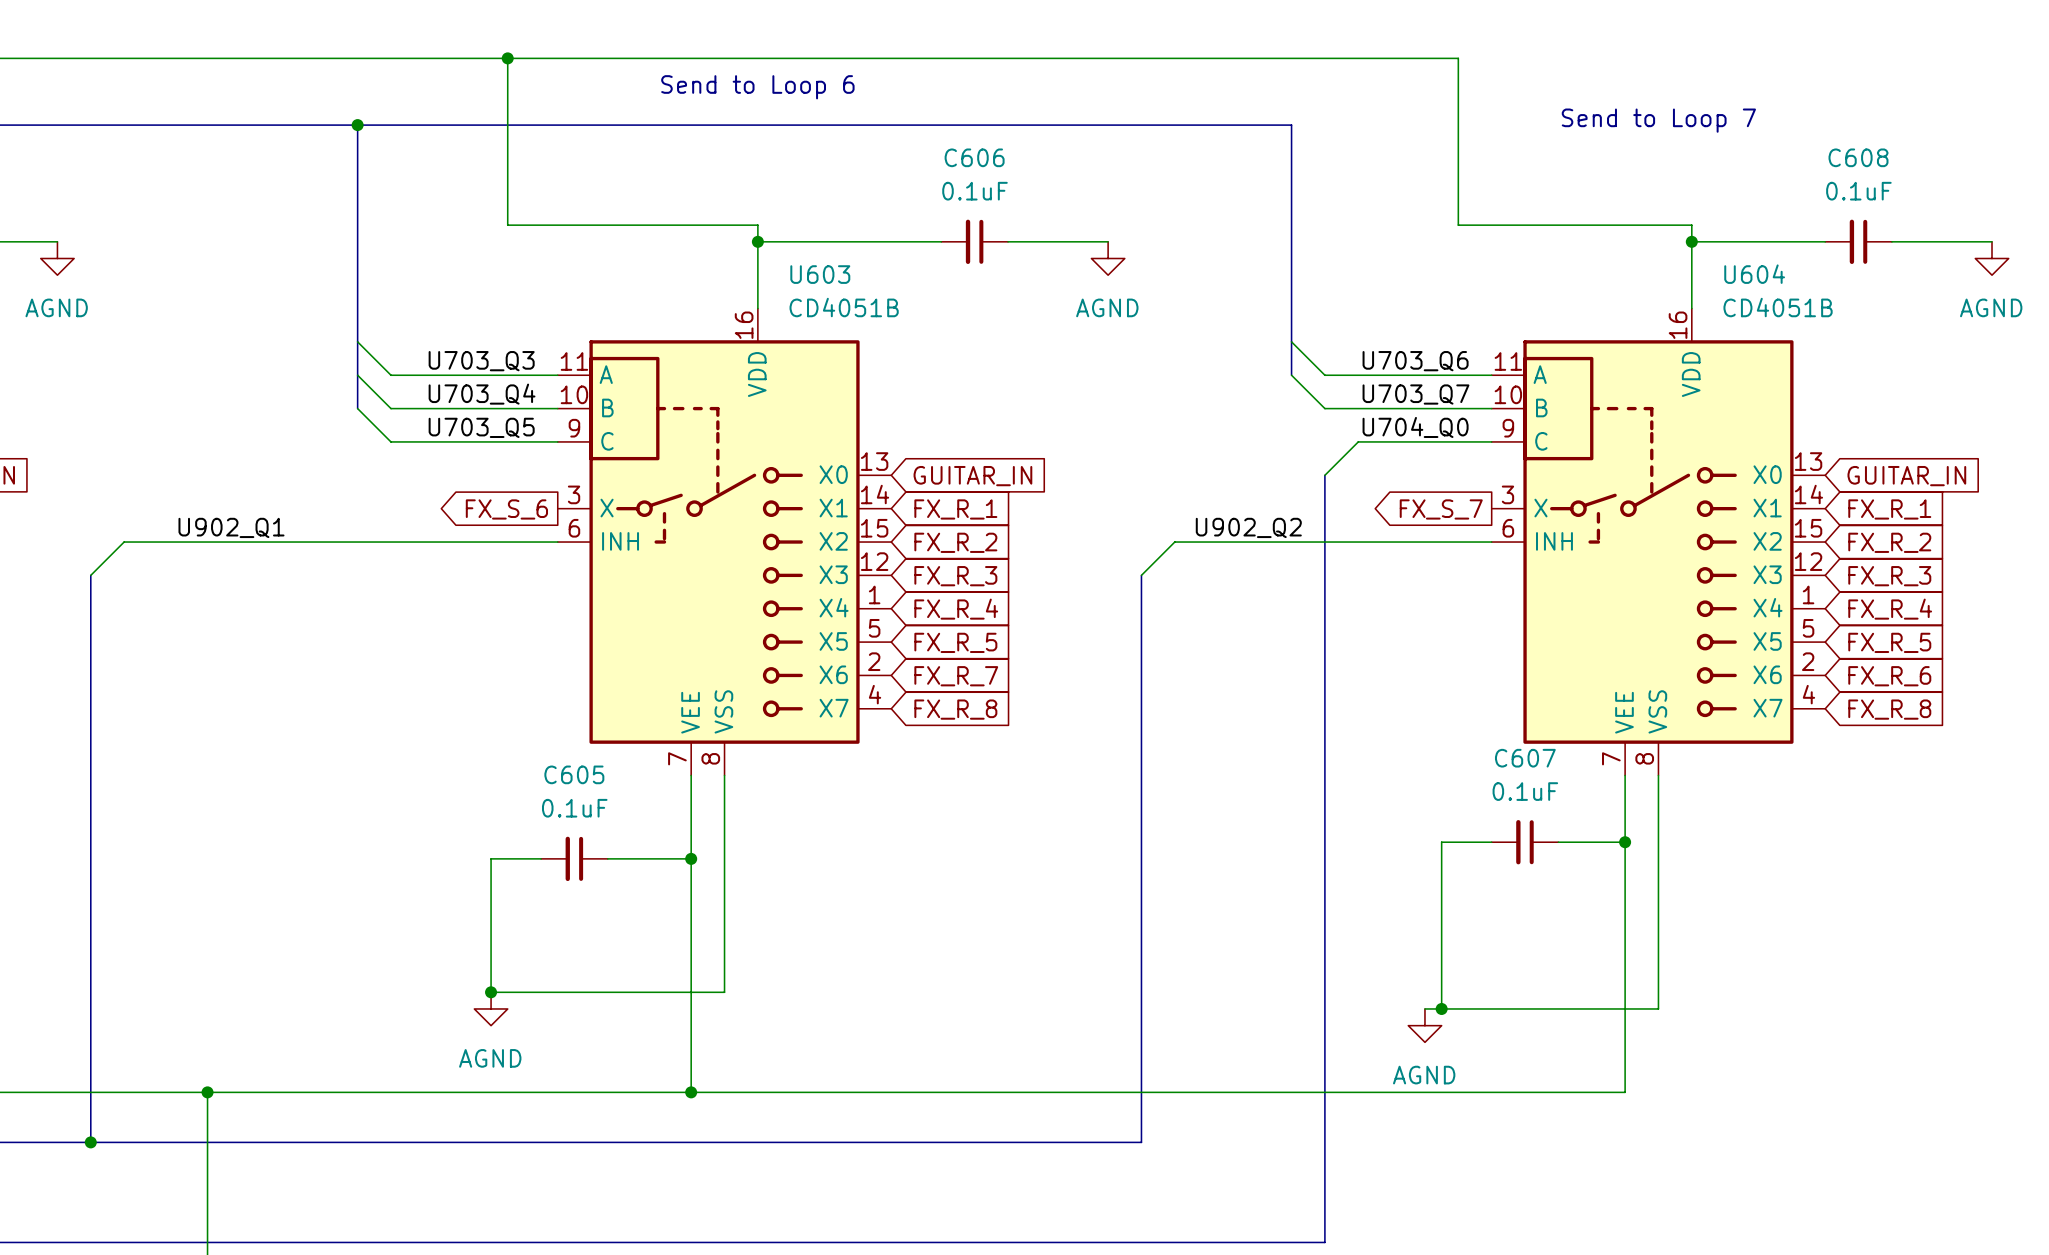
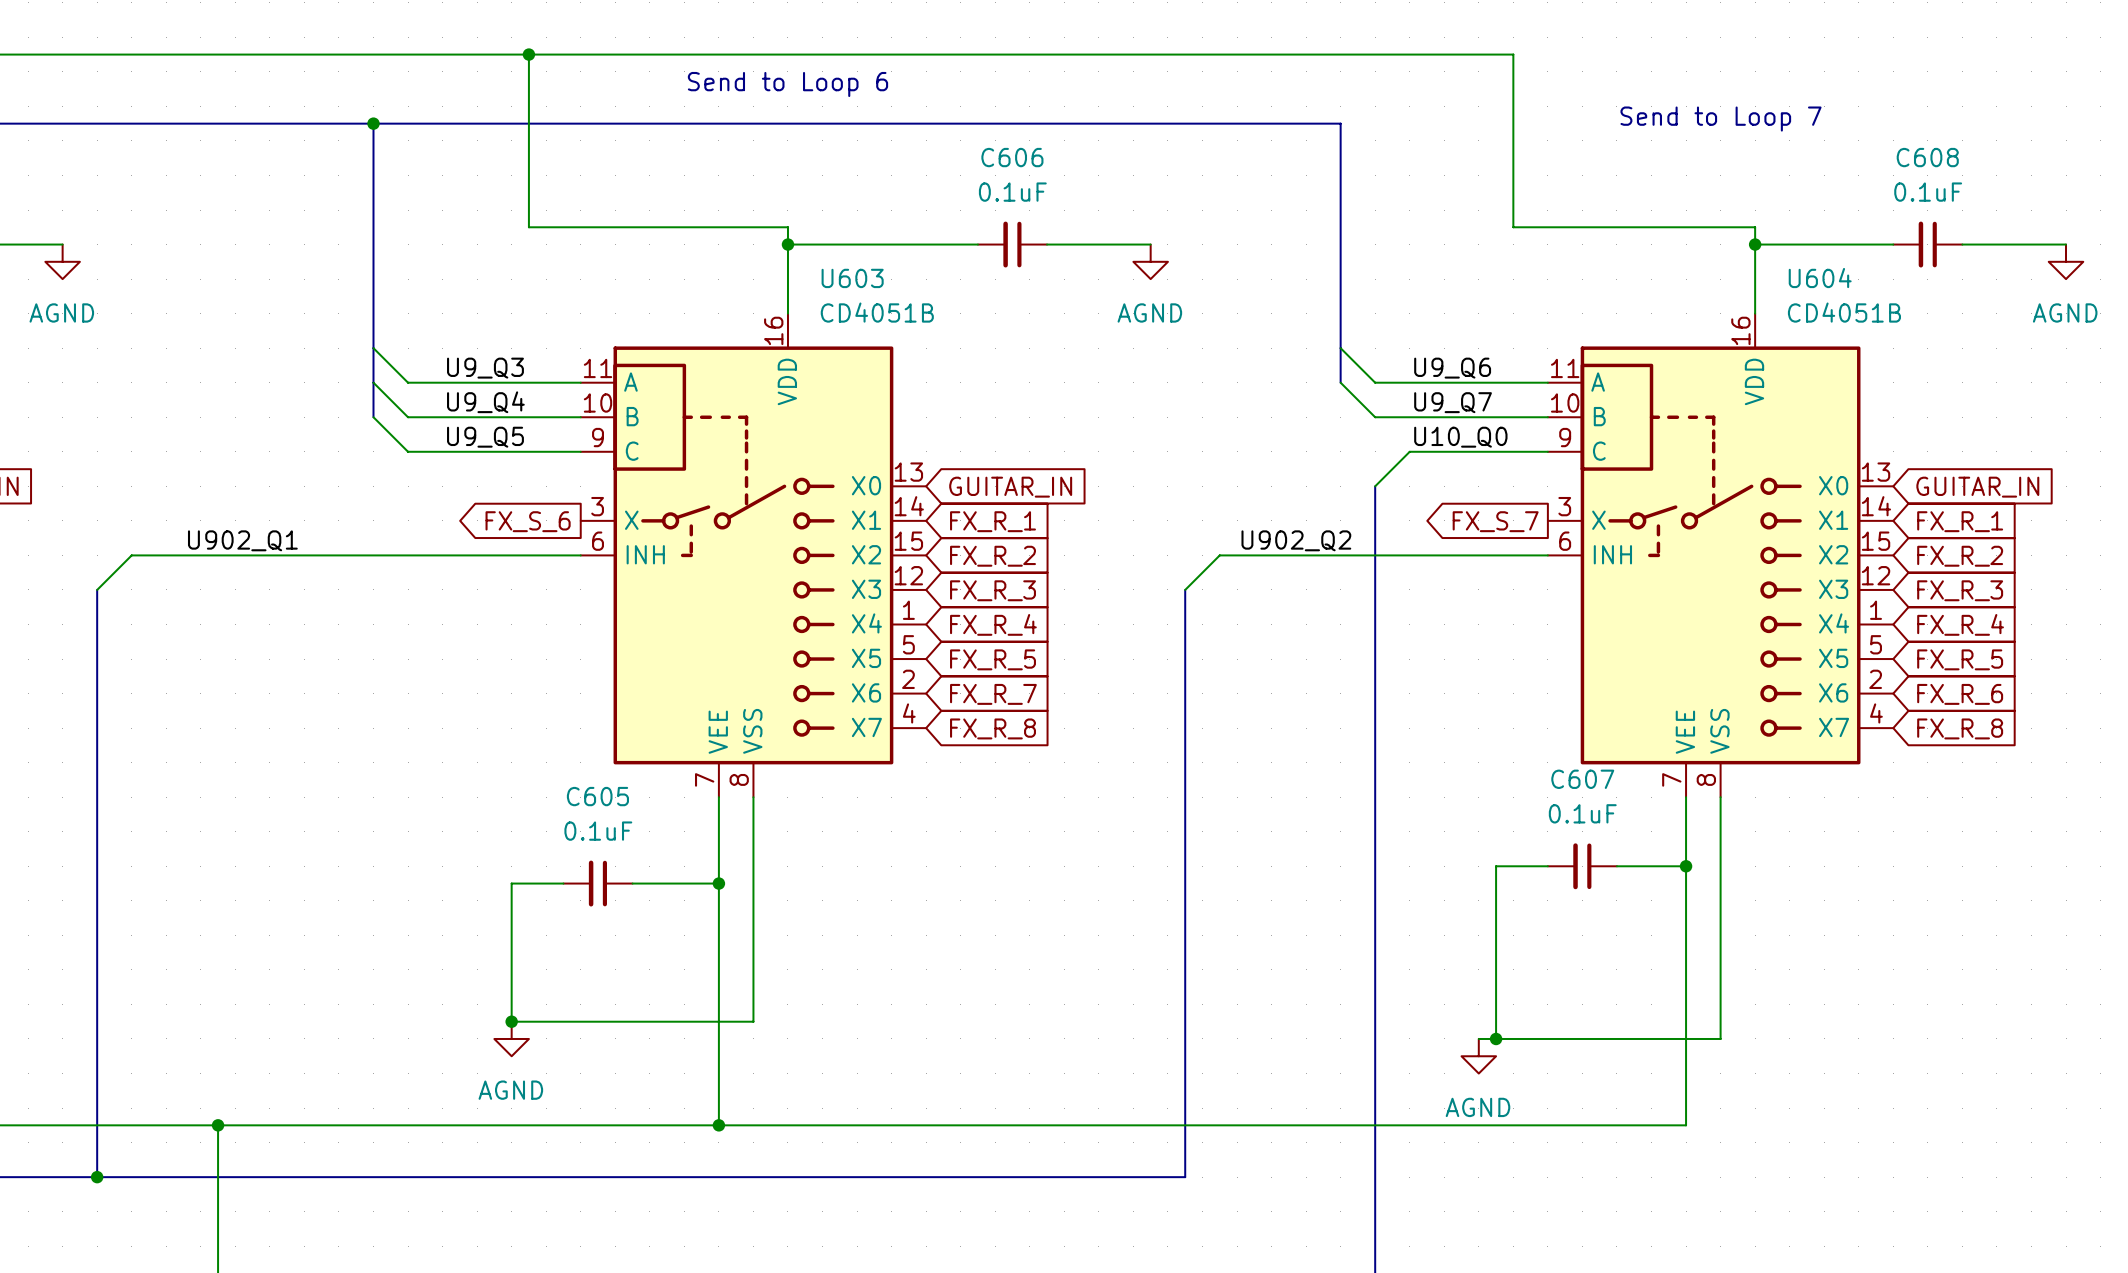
label: U703_Q3 (481, 361) -> U9_Q3 (485, 368)
label: U703_Q6 (1415, 361) -> U9_Q6 (1452, 368)
label: U703_Q4 (482, 394) -> U9_Q4 (485, 402)
label: U703_Q7 (1415, 394) -> U9_Q7 (1453, 402)
label: U703_Q5 (481, 427) -> U9_Q5 (485, 437)
label: U704_Q0 (1415, 427) -> U10_Q0 (1460, 437)

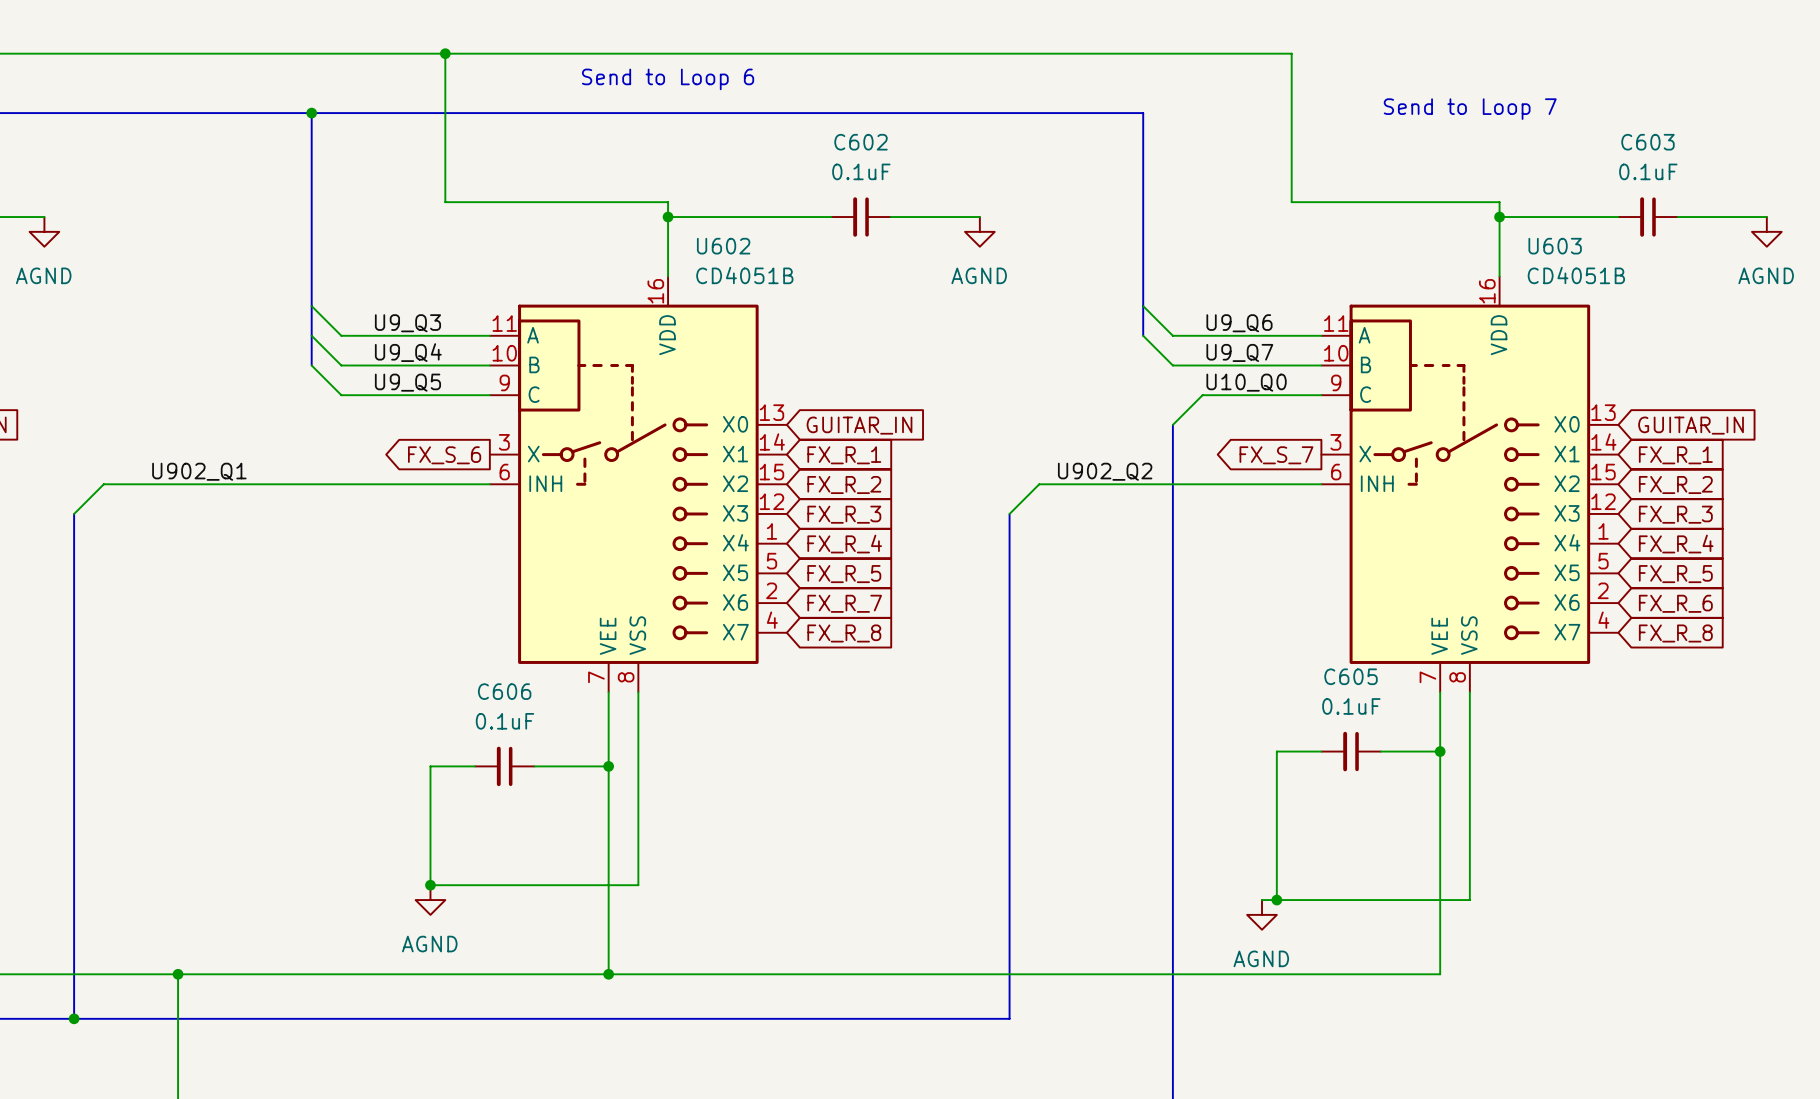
C606 name: C606 (1012, 157) -> C602 (861, 142)
C608 name: C608 (1927, 157) -> C603 (1647, 142)
U603 name: U603 (852, 278) -> U602 (723, 246)
U604 name: U604 (1820, 278) -> U603 (1555, 246)
C607 name: C607 (1582, 779) -> C605 (1351, 676)
C605 name: C605 (597, 796) -> C606 (504, 691)

